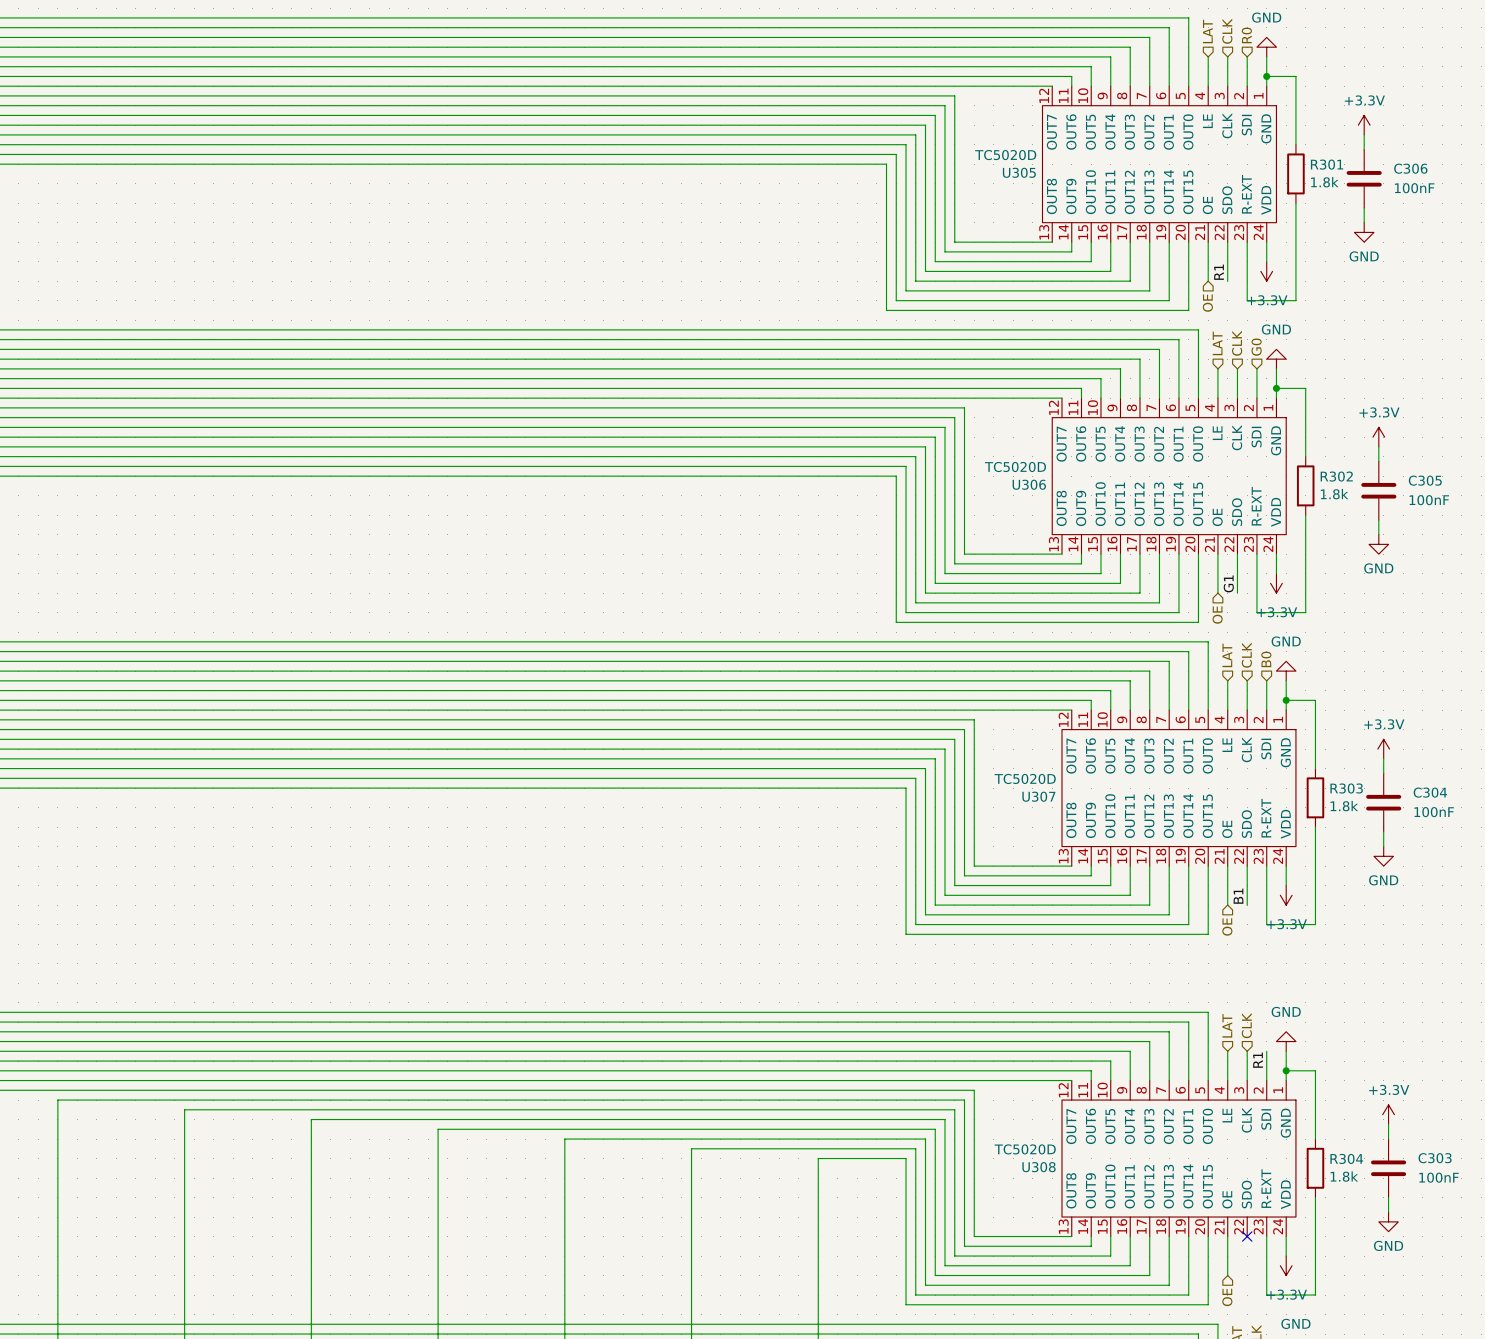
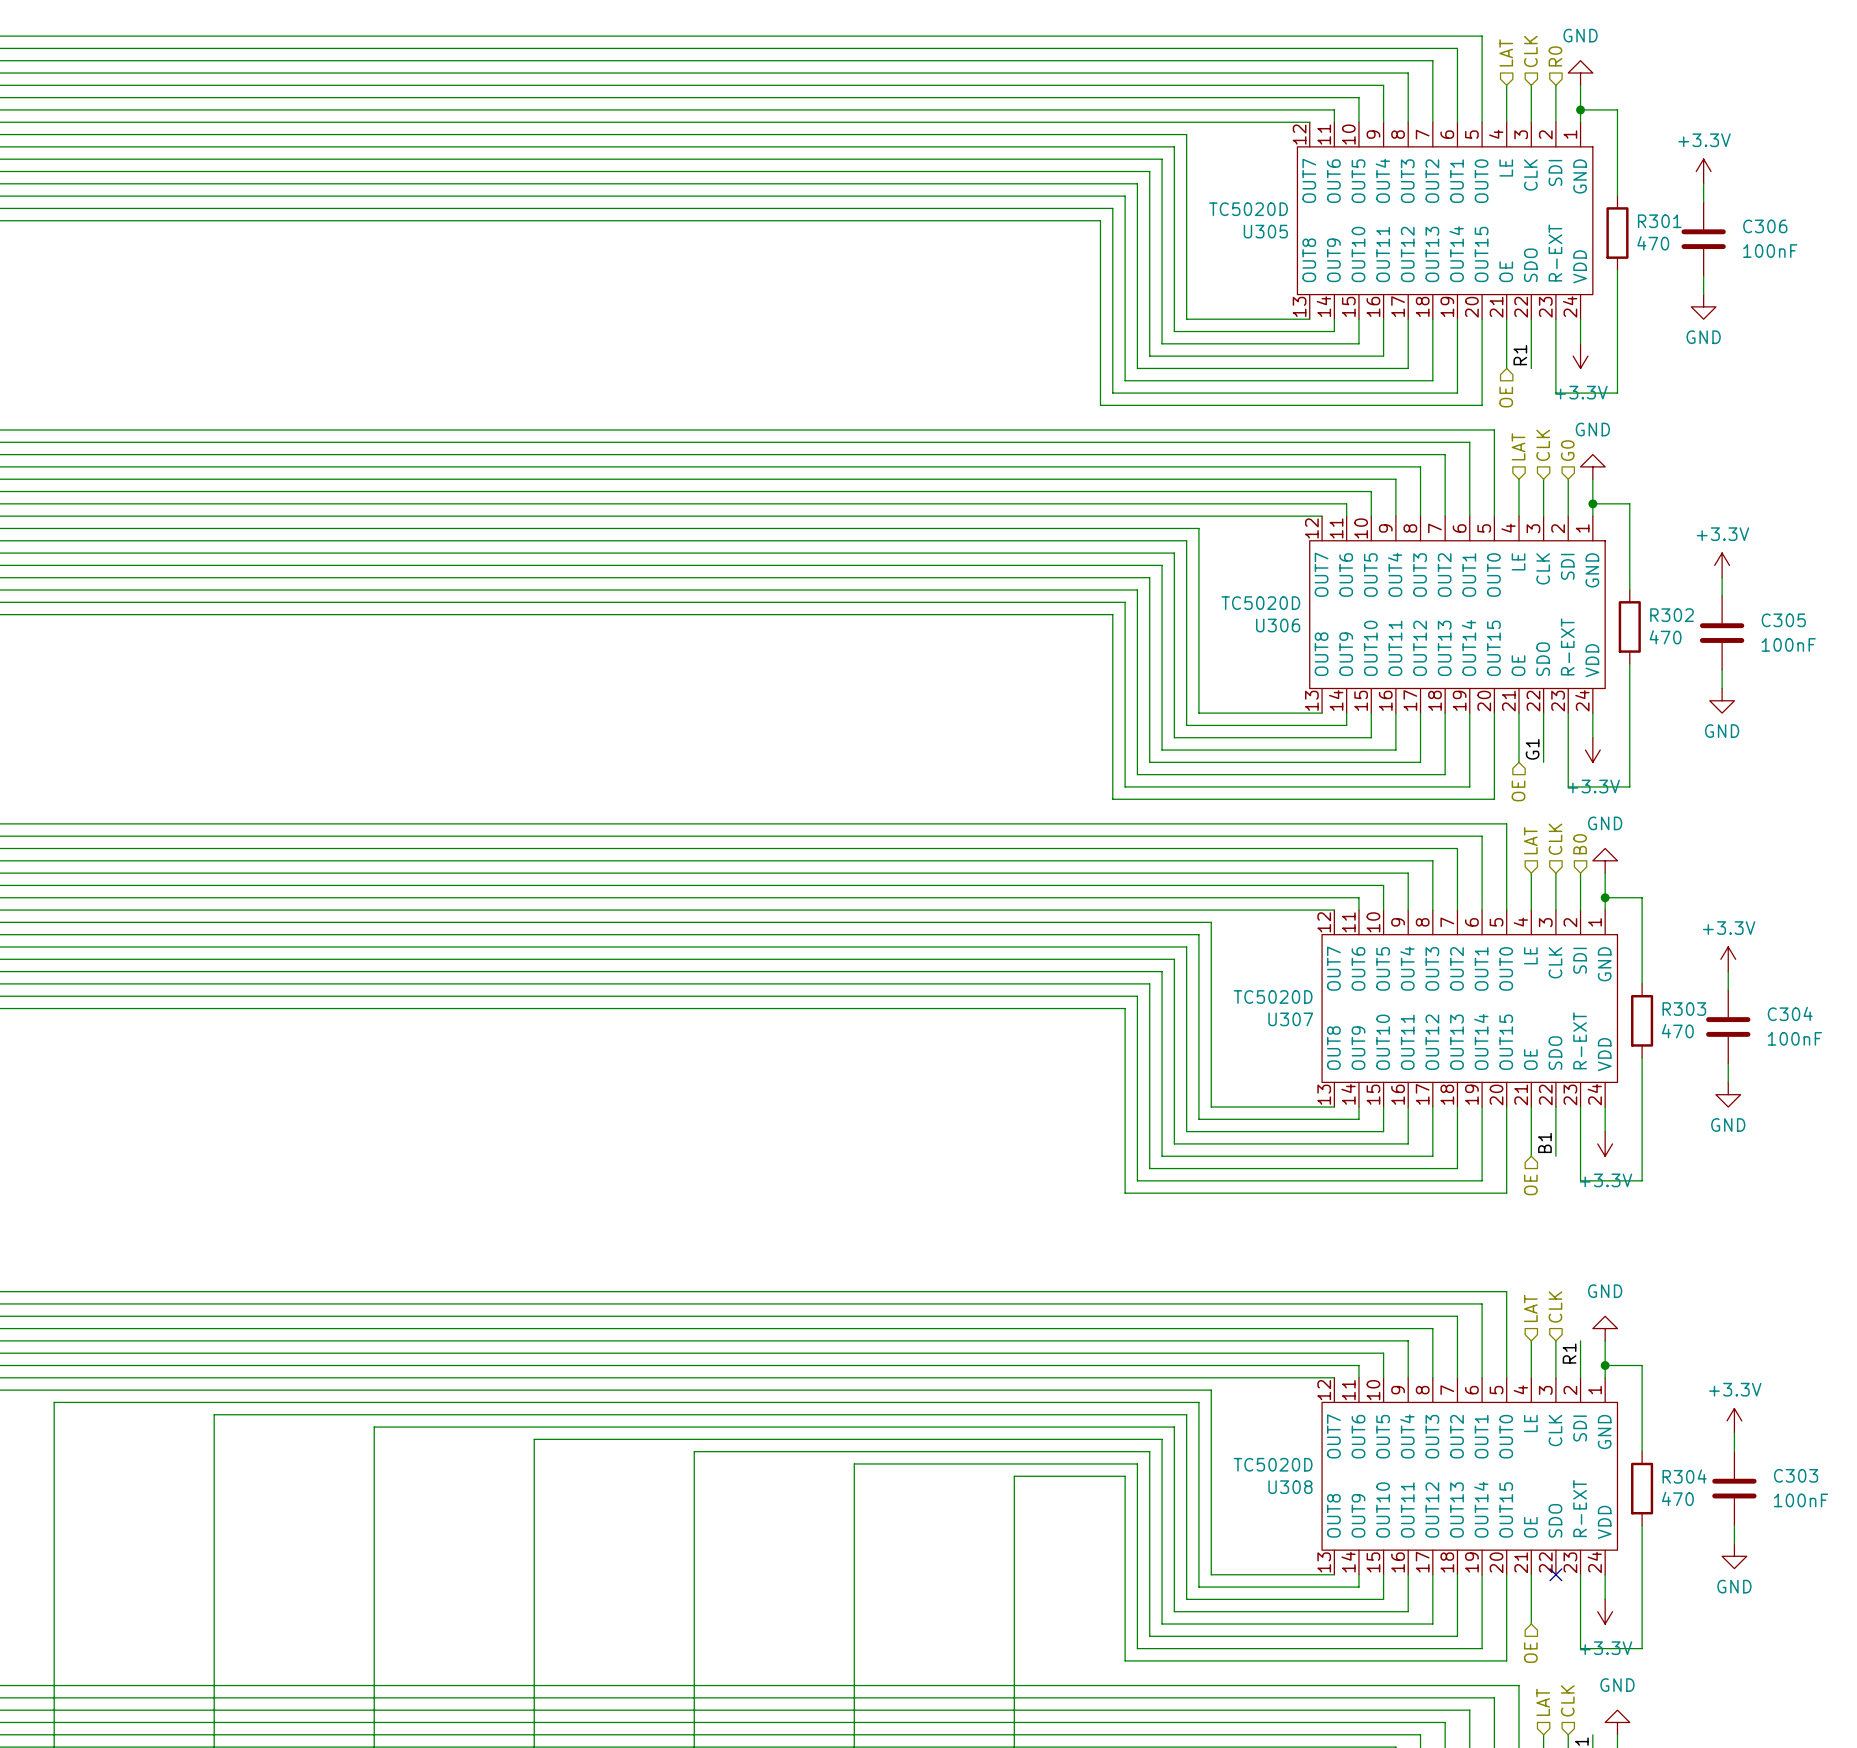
R301 value: 1.8k (1324, 182) -> 470 (1653, 243)
R302 value: 1.8k (1334, 494) -> 470 (1665, 637)
R303 value: 1.8k (1344, 806) -> 470 (1677, 1031)
R304 value: 1.8k (1344, 1176) -> 470 (1677, 1498)

